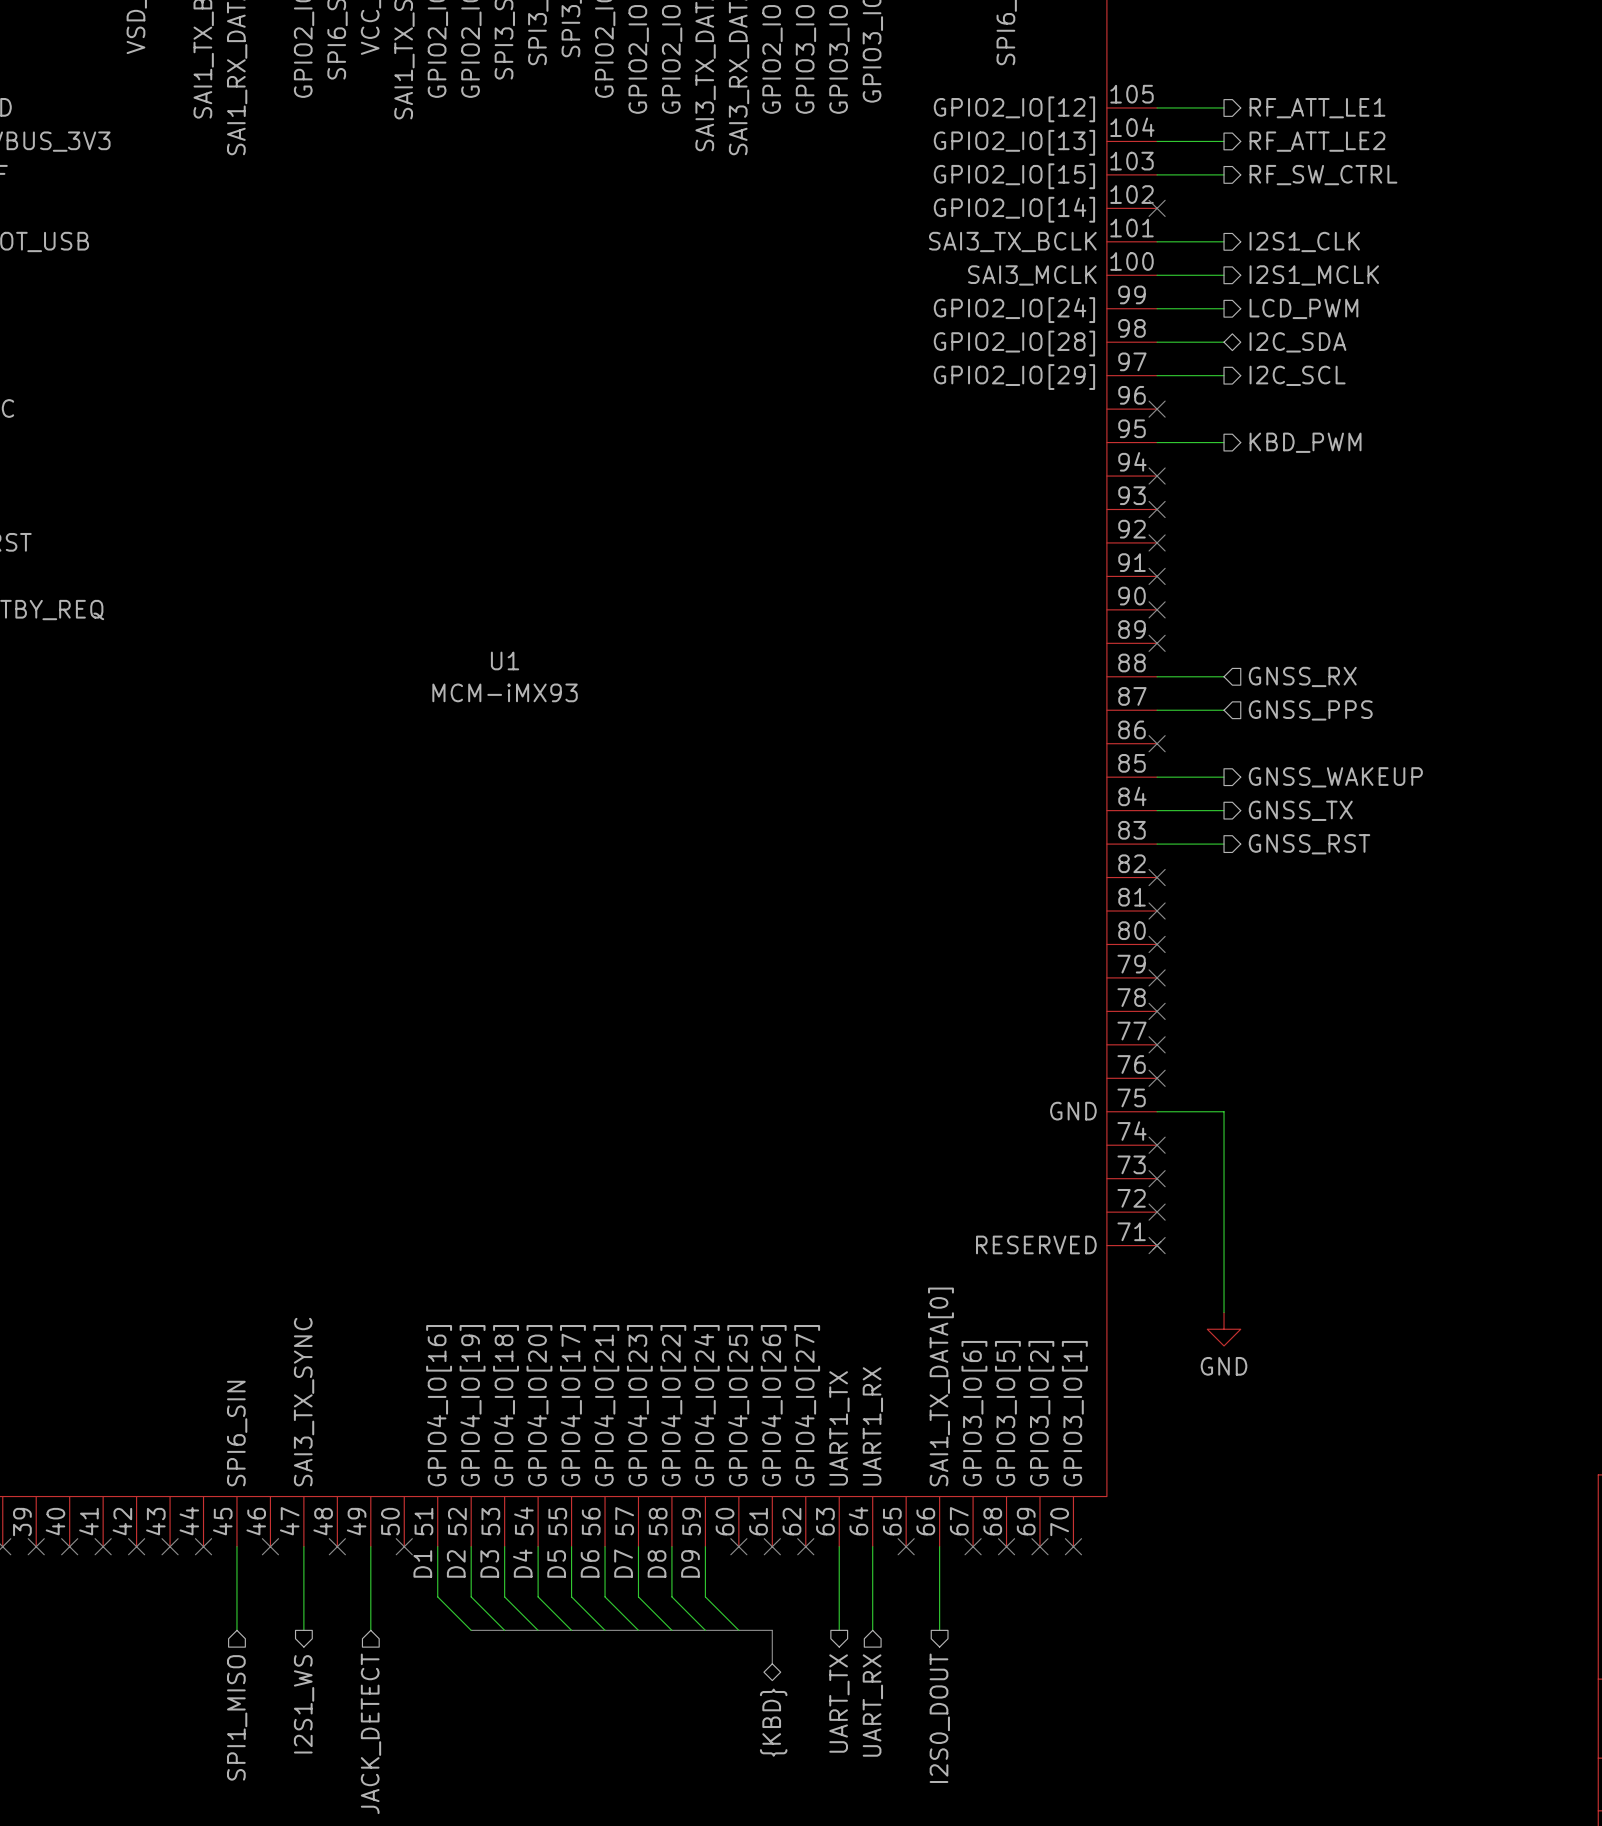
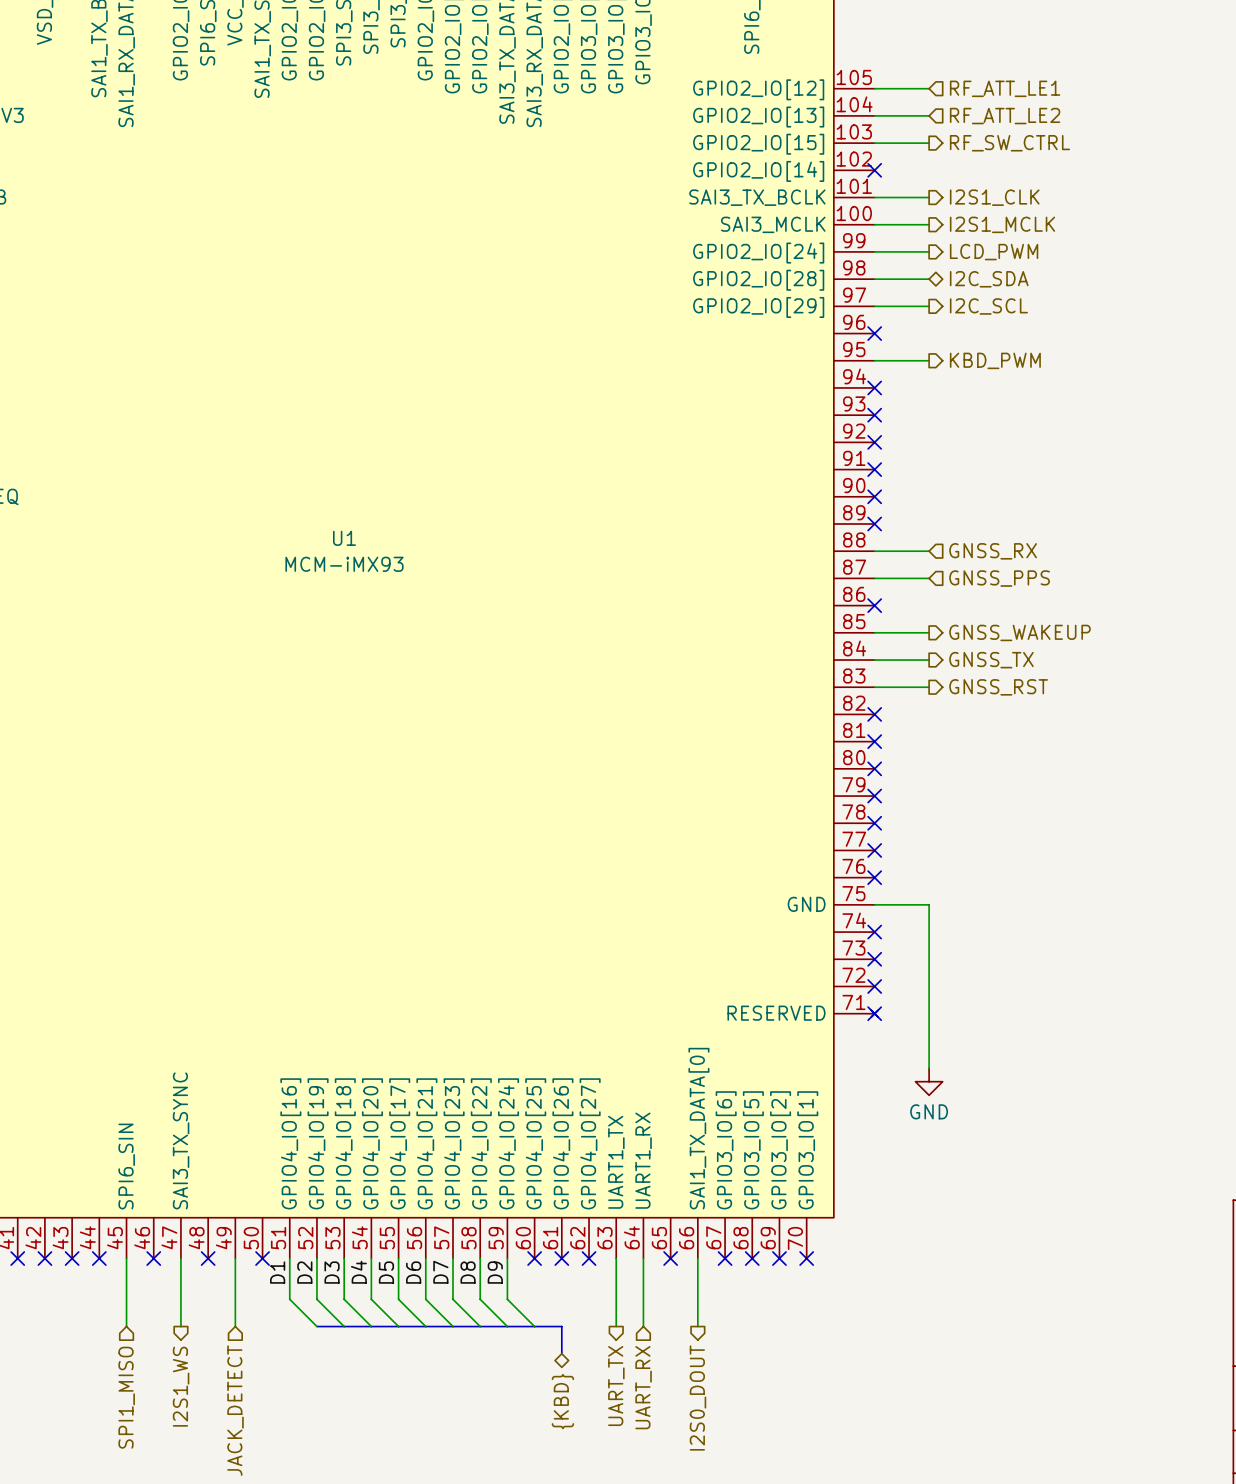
hierarchical label shape: output (1317, 108) -> input (1005, 88)
hierarchical label shape: output (1317, 141) -> input (1005, 116)

